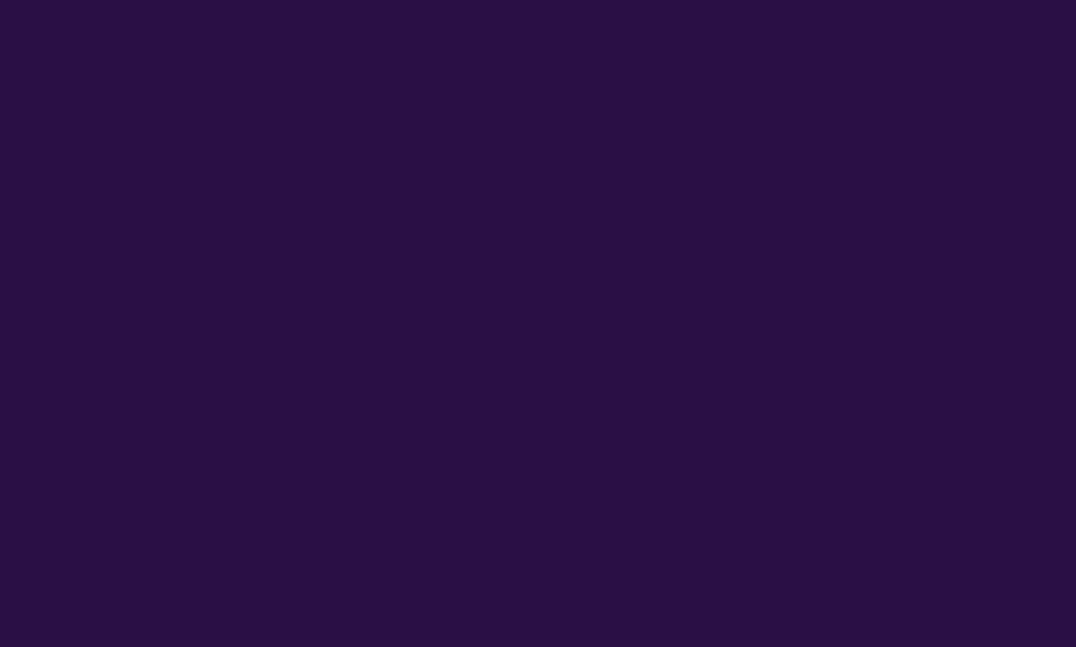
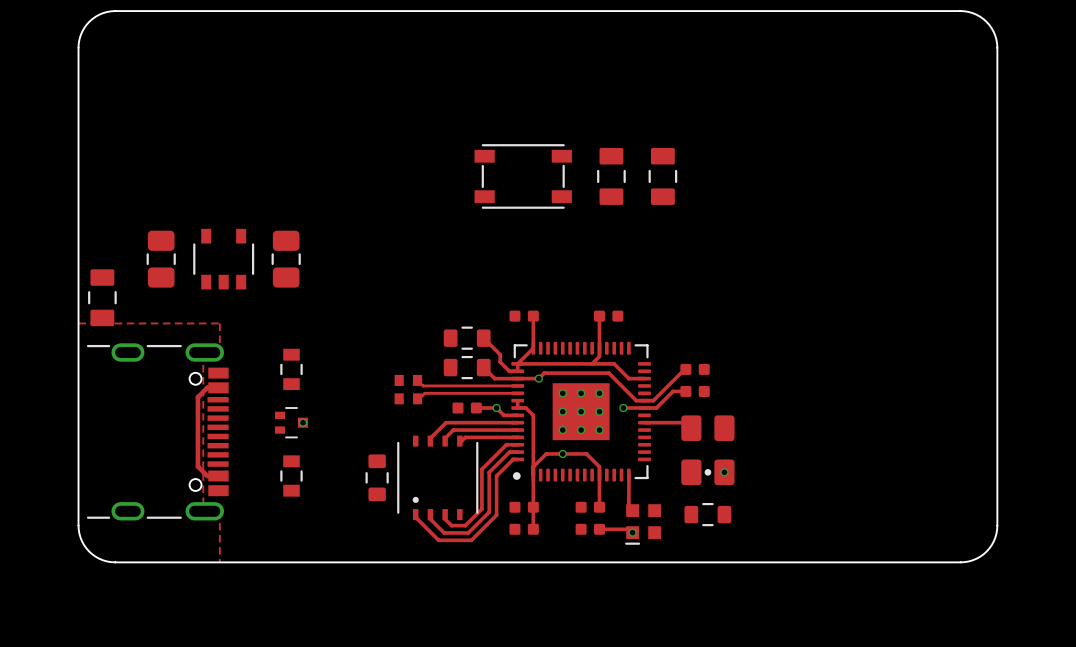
board edge: none -> (115, 11) (960, 11) (980, 16) (991, 28) (997, 47) (997, 525) (991, 545) (980, 556) (960, 562) (115, 562) (95, 556) (82, 541) (78, 525) (78, 47) (82, 31) (89, 21) (103, 13) (115, 11)
part: none -> (523, 176)
part: none -> (611, 176)
part: none -> (662, 176)
part: none -> (161, 259)
part: none -> (223, 259)
part: none -> (286, 259)
part: none -> (102, 297)
part: none -> (524, 316)
track: none -> (533, 316) (533, 348) (517, 363)
track: none -> (599, 316) (599, 356) (592, 363)
part: none -> (608, 316)
zone outline: none -> (78, 323) (219, 323) (219, 352) (203, 352) (203, 510) (219, 510) (219, 562)
part: none -> (467, 338)
track: none -> (483, 338) (500, 354) (500, 362) (509, 371) (517, 371) (517, 363)
track: none -> (517, 363) (614, 363) (628, 378) (644, 378)
part: none -> (467, 367)
track: none -> (483, 367) (494, 378) (538, 378) (544, 373) (608, 373) (636, 400) (653, 400) (685, 369)
part: none -> (291, 369)
part: none -> (695, 369)
via: none -> (538, 378)
part: none -> (408, 380)
track: none -> (417, 380) (423, 385) (517, 385)
track: none -> (218, 387) (207, 387) (197, 397) (197, 466) (207, 476) (218, 476)
track: none -> (685, 391) (673, 391) (656, 408) (623, 408)
part: none -> (695, 391)
track: none -> (517, 393) (424, 393) (417, 398)
part: none -> (408, 398)
track: none -> (517, 400) (517, 408) (525, 408) (533, 415) (533, 529)
part: none -> (467, 408)
track: none -> (476, 408) (496, 408) (503, 415) (517, 415)
via: none -> (496, 408)
via: none -> (623, 408)
part: none -> (581, 411)
part: none -> (291, 422)
via: none -> (302, 422)
track: none -> (517, 422) (446, 422) (430, 438) (430, 441)
track: none -> (644, 422) (685, 422) (691, 428)
track: none -> (517, 430) (453, 430) (445, 438) (445, 441)
part: none -> (157, 431)
track: none -> (517, 437) (465, 437) (459, 441)
track: none -> (517, 444) (506, 444) (481, 469) (481, 509) (465, 525) (451, 525) (445, 519) (445, 514)
part: none -> (707, 450)
track: none -> (517, 452) (509, 452) (489, 472) (489, 512) (468, 532) (444, 532) (430, 519) (430, 514)
via: none -> (562, 453)
track: none -> (517, 459) (513, 459) (496, 476) (496, 515) (471, 540) (438, 540) (415, 517) (415, 514)
track: none -> (533, 466) (546, 453) (586, 453) (599, 466) (599, 507)
via: none -> (724, 472)
track: none -> (628, 475) (628, 506) (632, 510)
part: none -> (291, 476)
part: none -> (377, 477)
part: none -> (437, 477)
part: none -> (524, 507)
part: none -> (590, 507)
part: none -> (707, 514)
part: none -> (643, 524)
part: none -> (524, 529)
part: none -> (590, 529)
track: none -> (599, 529) (629, 529) (632, 532)
via: none -> (632, 532)

